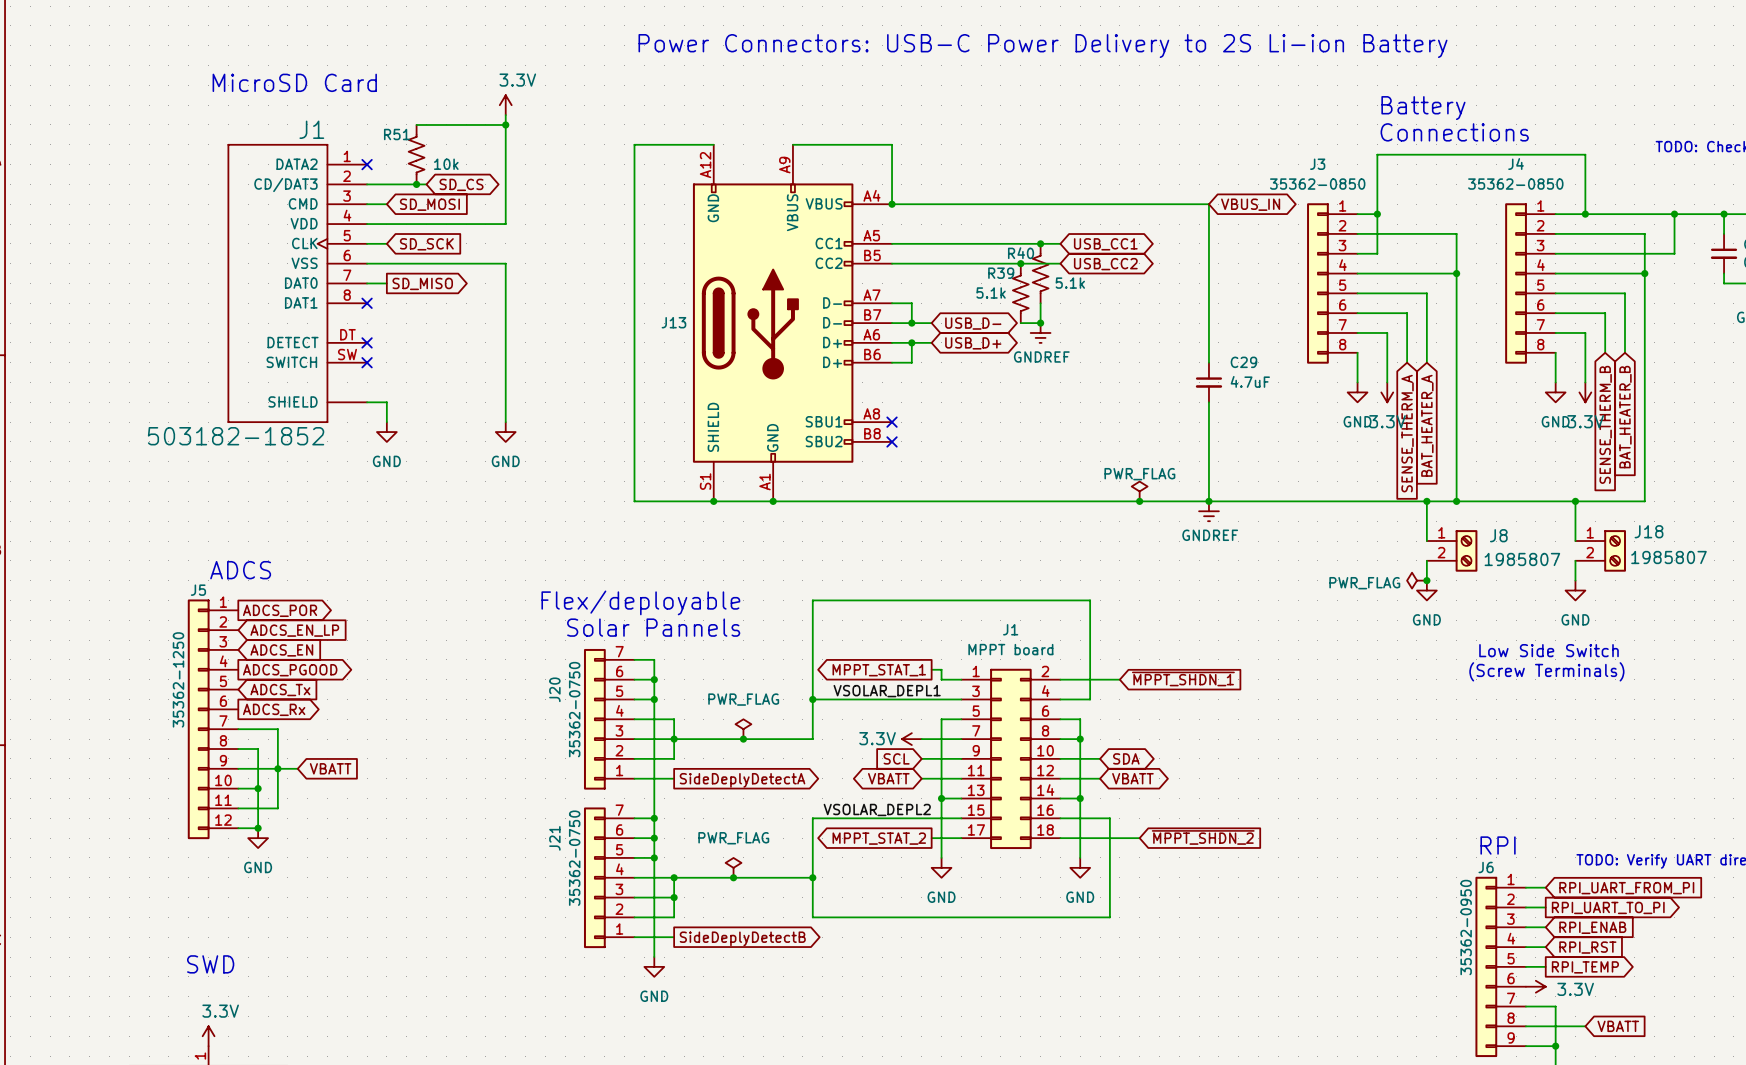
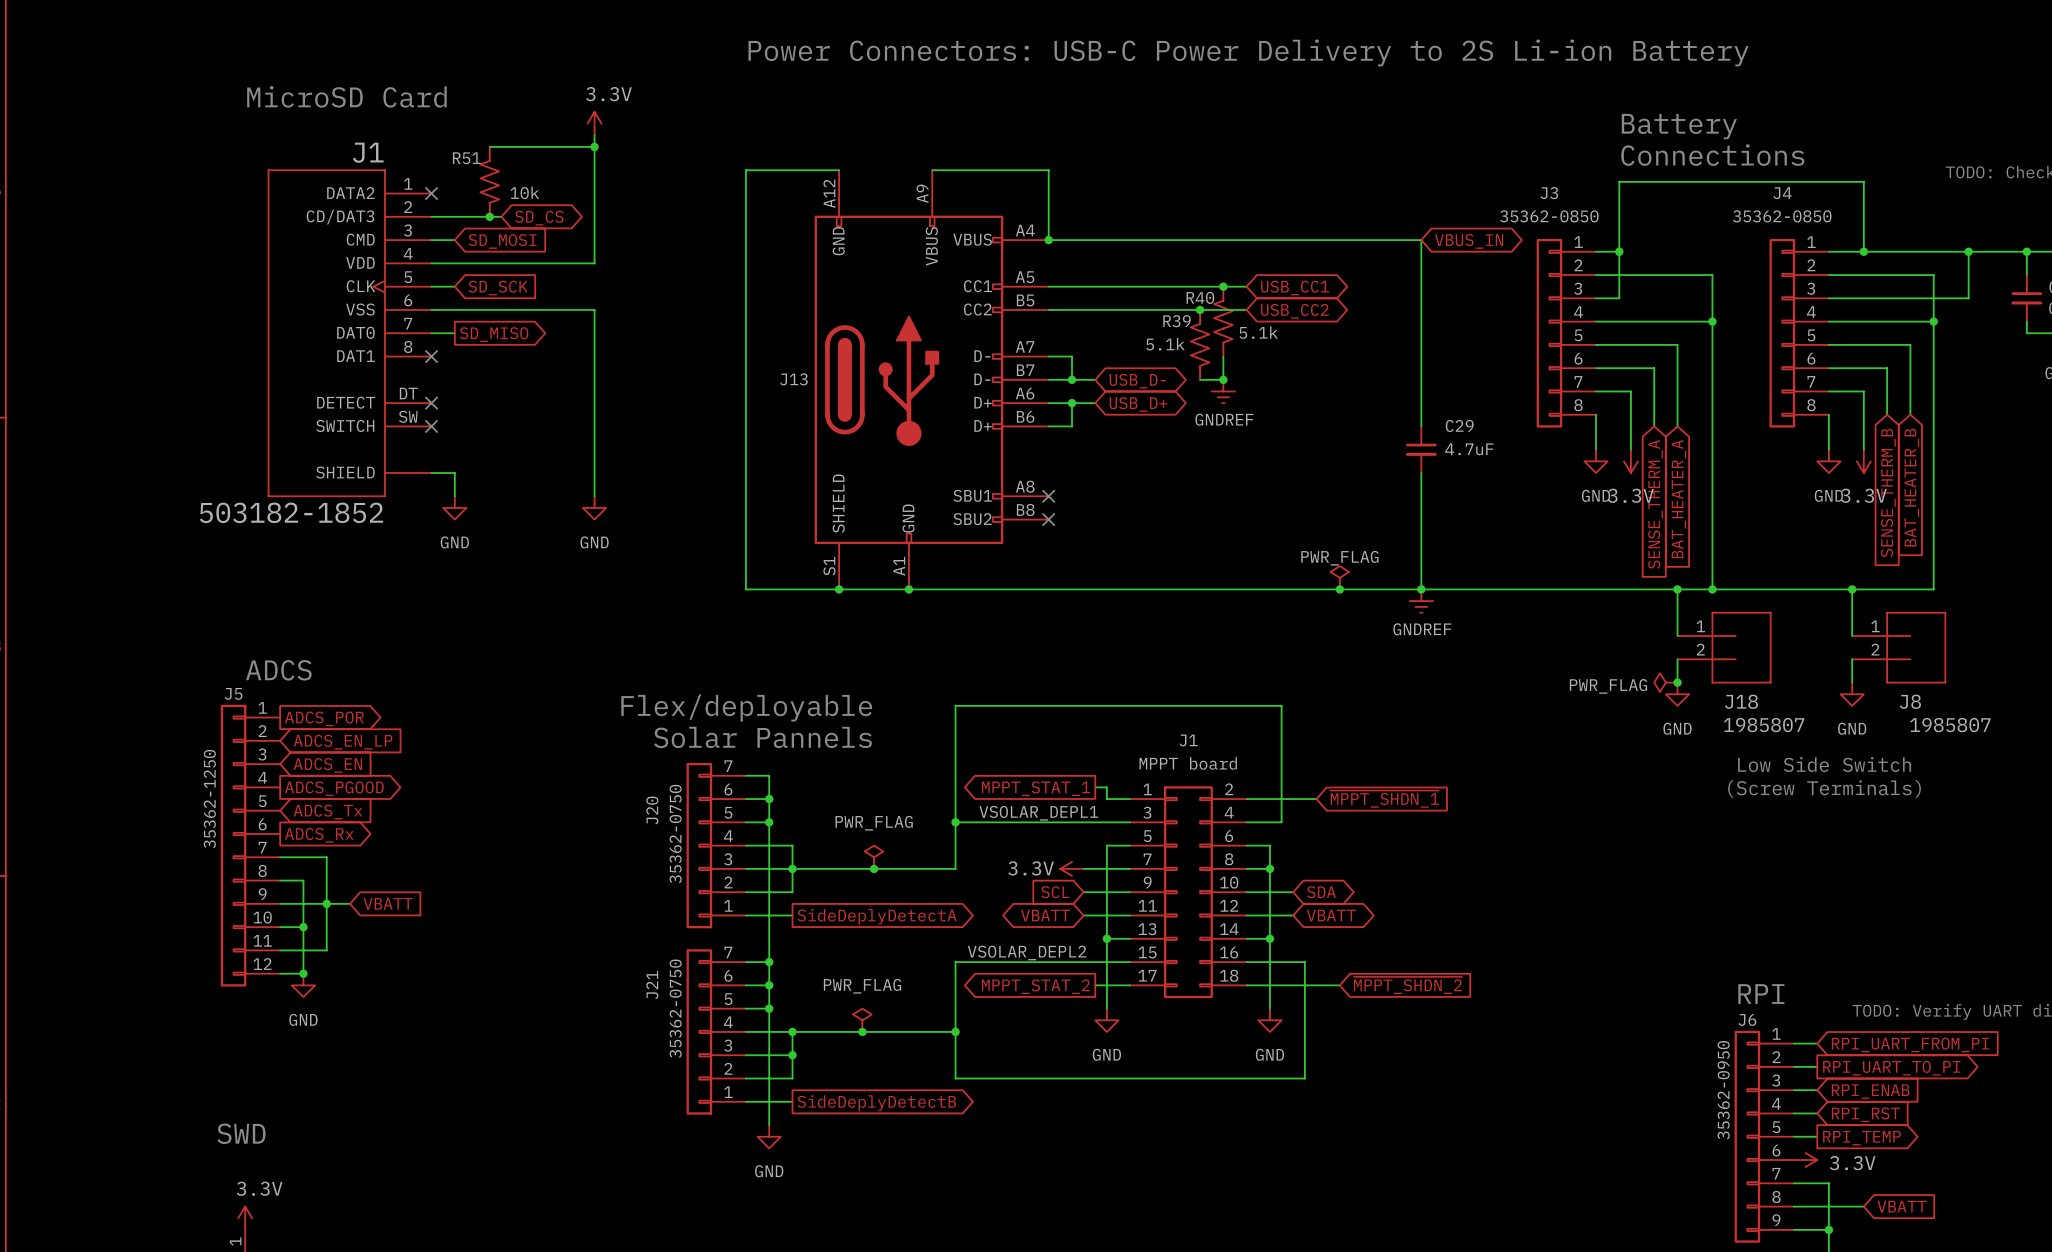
J8 symbol: [1426, 530, 1478, 572] -> [1852, 612, 1946, 683]
J18 symbol: [1575, 530, 1626, 572] -> [1677, 612, 1771, 683]
J18 name position: J18 (1649, 531) -> J18 (1741, 701)
J8 name position: J8 (1498, 535) -> J8 (1910, 701)
J18 value position: 1985807 (1668, 557) -> 1985807 (1764, 725)
J8 value position: 1985807 (1522, 559) -> 1985807 (1950, 725)

